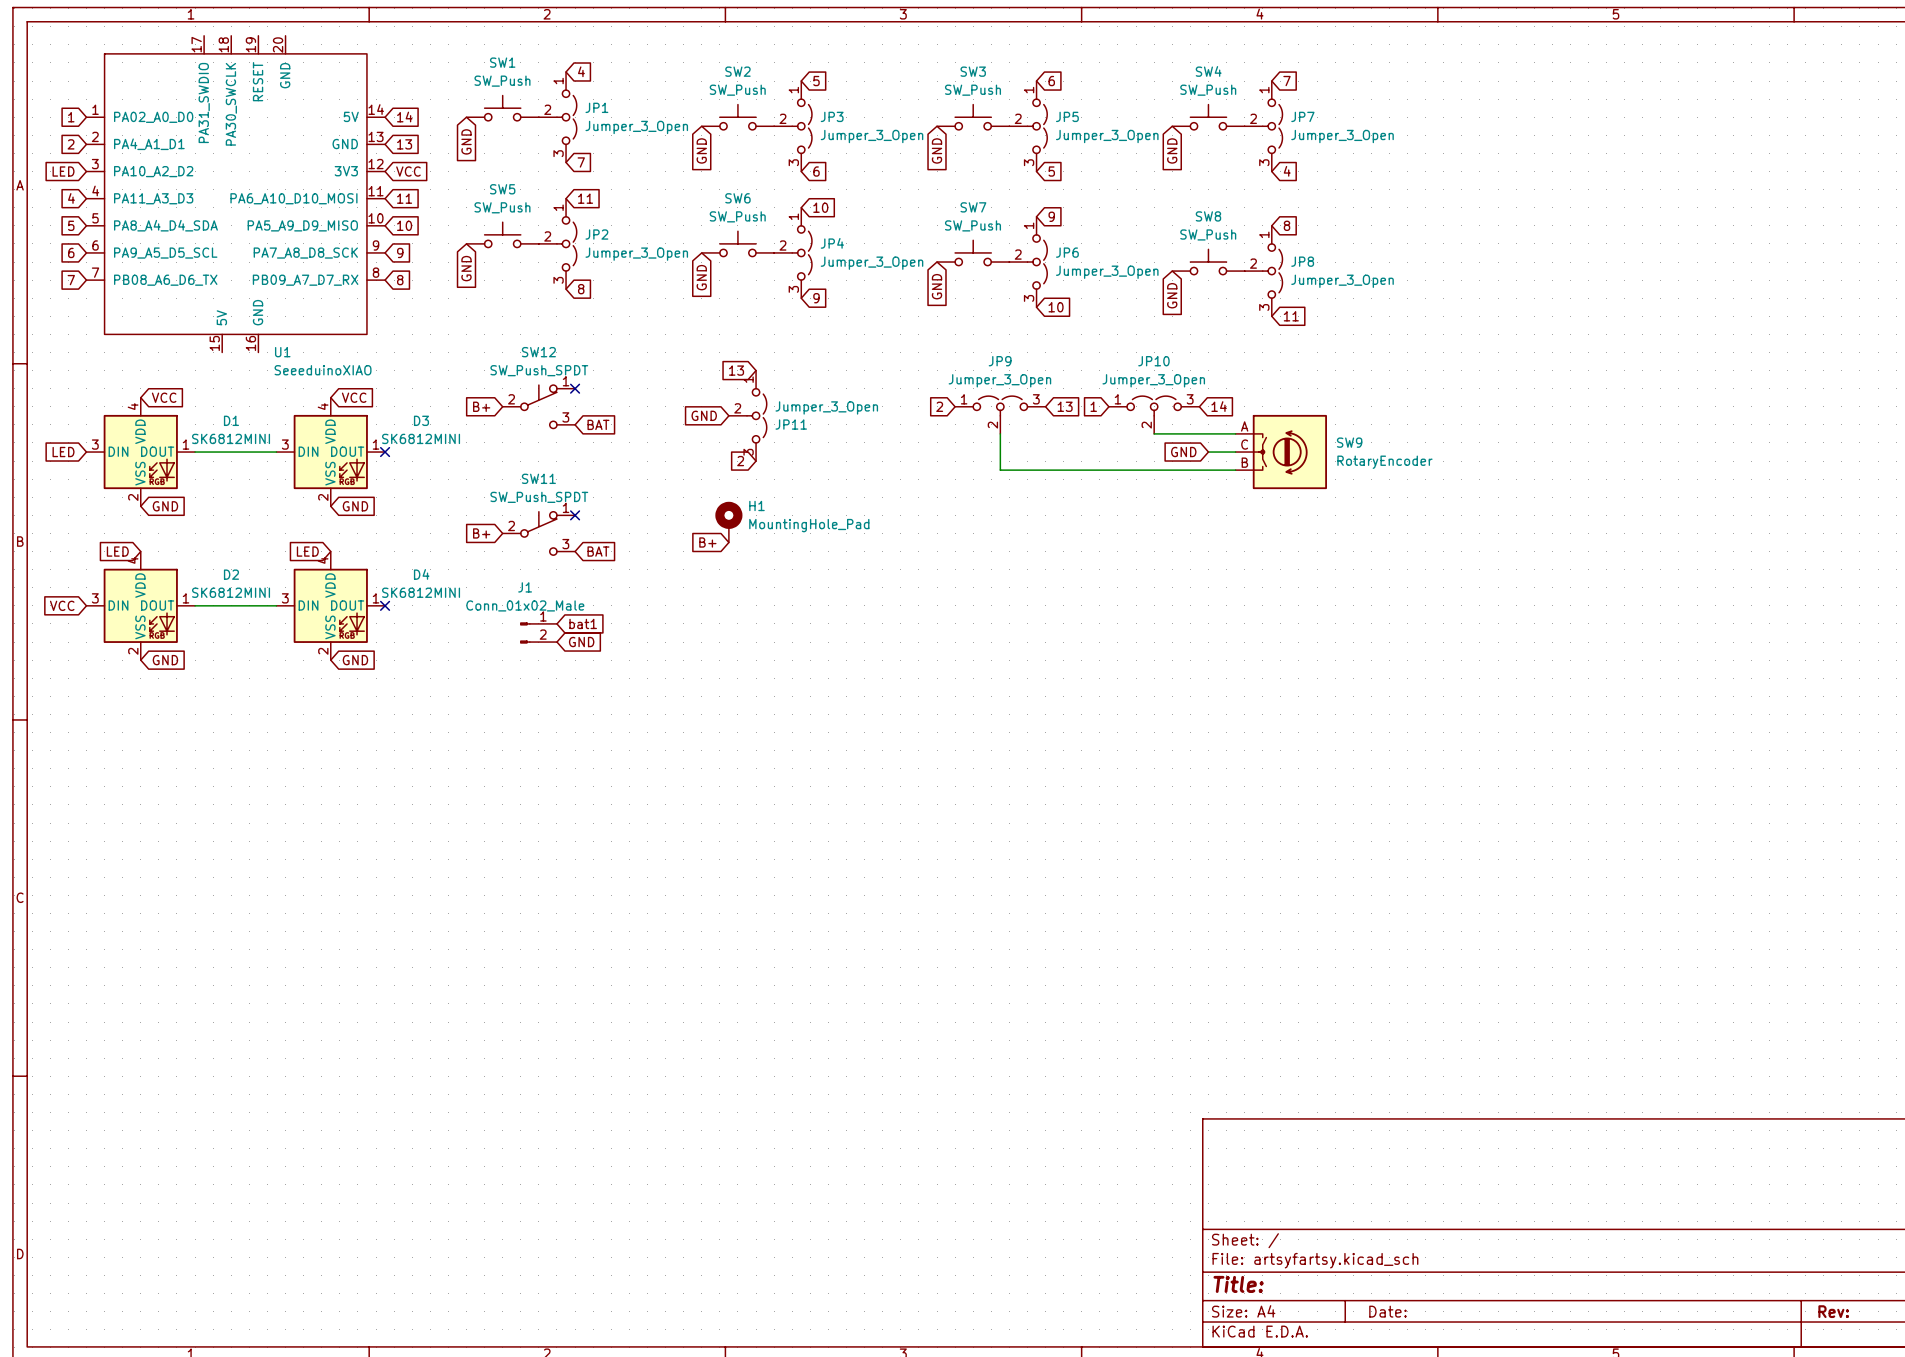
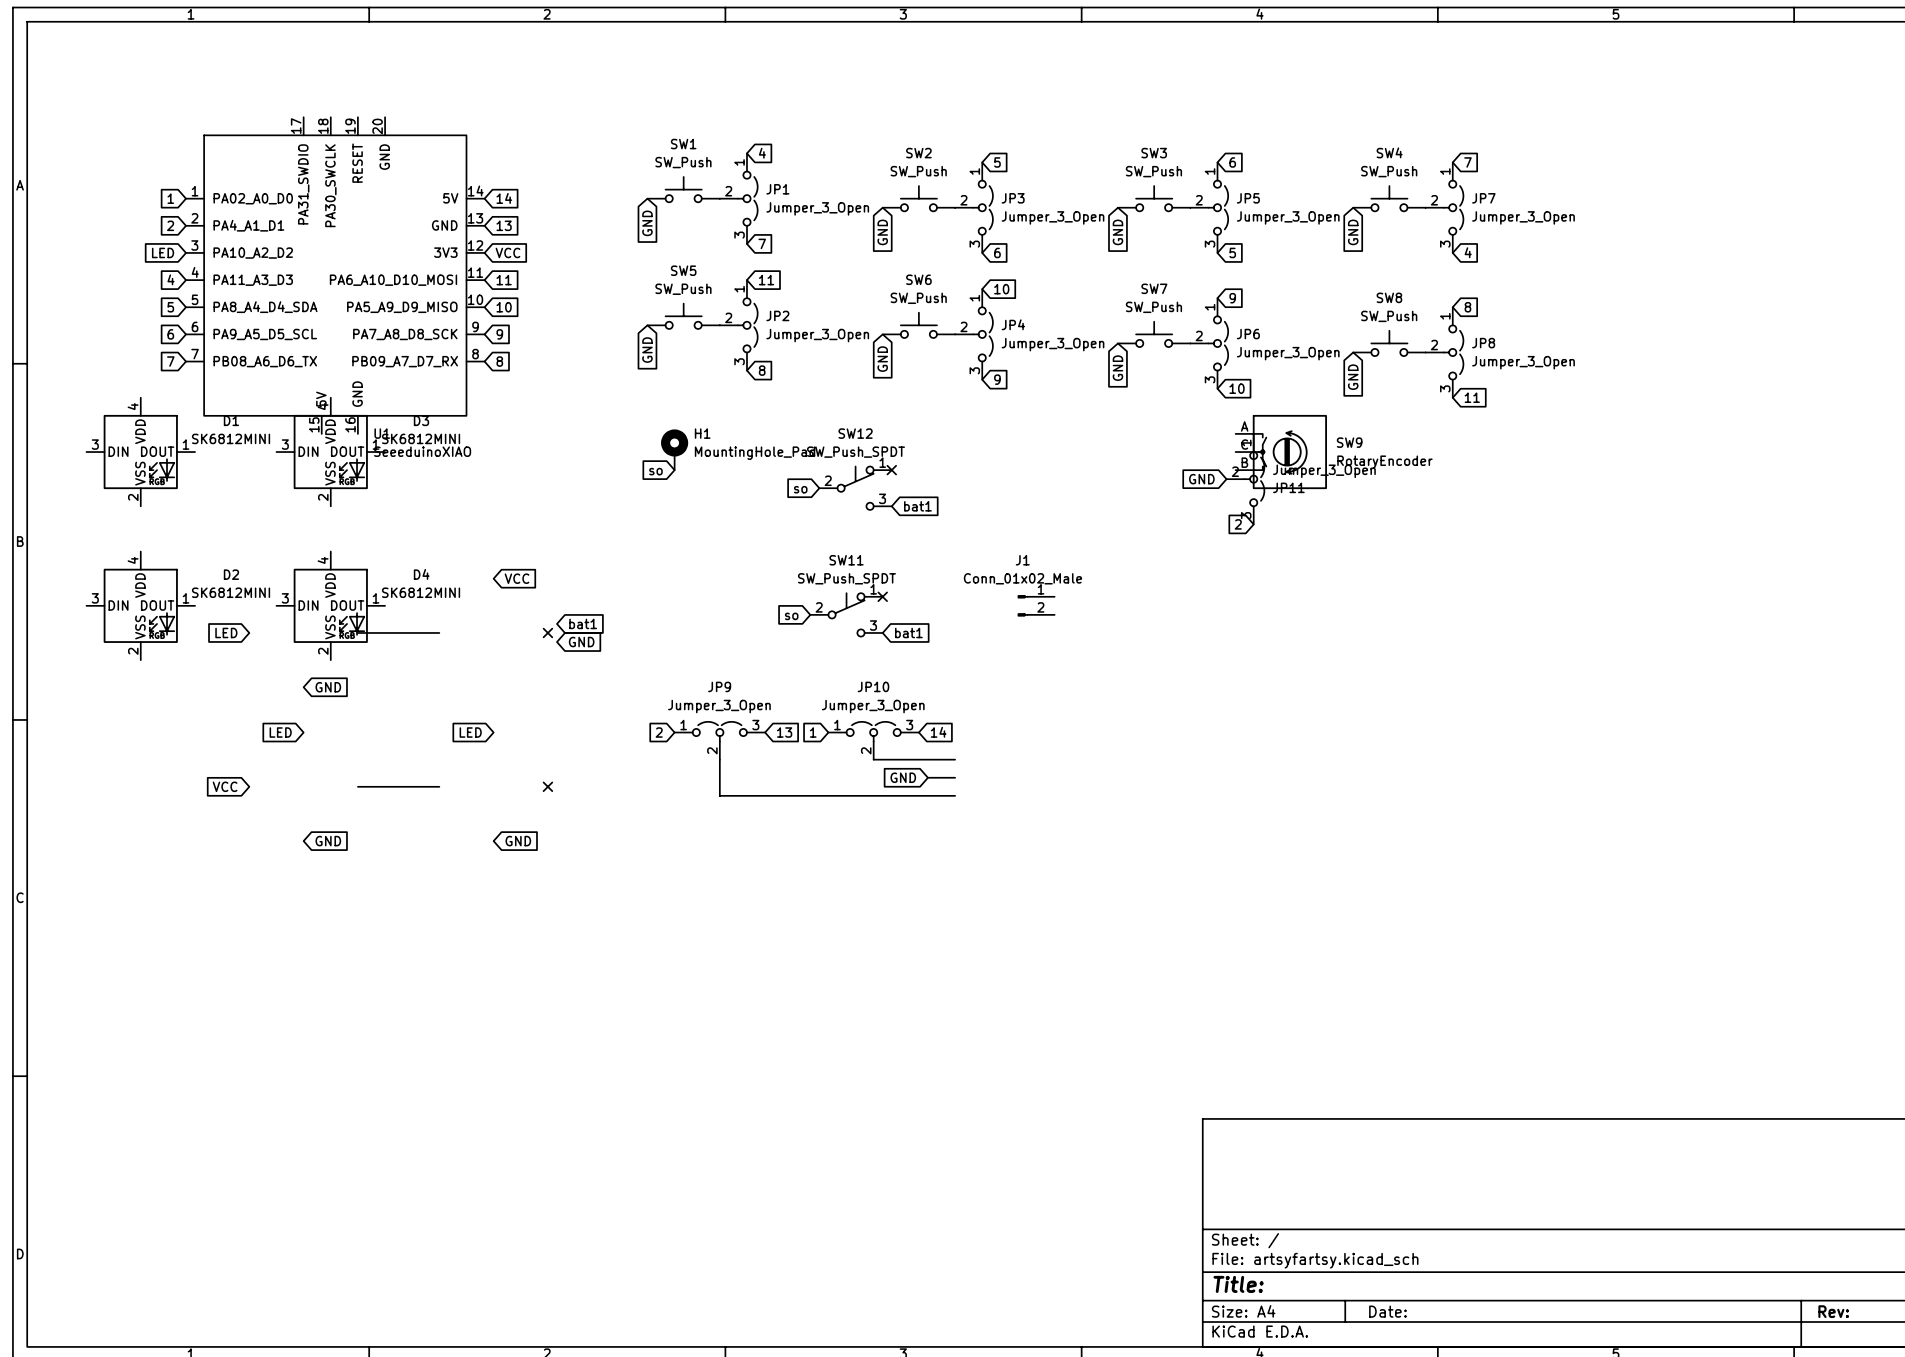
global label: 4 (581, 71) -> none
global label: 5 (816, 81) -> none
global label: 6 (1051, 81) -> none
global label: 7 (1286, 81) -> none
SW1 position: (502, 108) -> (683, 189)
global label position: 1 (71, 117) -> 1 (170, 198)
global label position: 14 (404, 117) -> 14 (504, 198)
JP1 position: (557, 117) -> (738, 198)
SW2 position: (737, 117) -> (918, 198)
SW3 position: (973, 117) -> (1154, 198)
SW4 position: (1208, 117) -> (1389, 198)
JP3 position: (793, 126) -> (974, 207)
JP5 position: (1028, 126) -> (1209, 207)
JP7 position: (1263, 126) -> (1444, 207)
global label: GND (466, 141) -> none
global label position: 2 (71, 144) -> 2 (170, 225)
global label position: 13 (404, 144) -> 13 (504, 225)
global label: GND (701, 150) -> none
global label: GND (937, 150) -> none
global label: GND (1172, 150) -> none
global label: none -> 4 (762, 153)
global label: 7 (581, 162) -> none
global label: none -> 6 (1232, 162)
global label: none -> 7 (1467, 162)
global label: LED (63, 171) -> none
global label: VCC (408, 171) -> none
global label: 6 (816, 171) -> none
global label position: 5 (1051, 171) -> 5 (997, 162)
global label: 4 (1287, 171) -> none
U1 position: (235, 194) -> (335, 275)
global label position: 4 (71, 198) -> 4 (171, 279)
global label: 11 (404, 198) -> none
global label: 11 (585, 198) -> none
global label: 10 (820, 207) -> none
global label: 9 (1051, 216) -> none
global label: none -> GND (647, 223)
global label position: 5 (71, 225) -> 5 (170, 307)
global label position: 10 (404, 225) -> 10 (504, 307)
global label: 8 (1286, 225) -> none
global label: none -> GND (882, 232)
global label: none -> GND (1117, 232)
global label: none -> GND (1353, 232)
SW5 position: (502, 234) -> (683, 316)
JP2 position: (557, 243) -> (738, 325)
SW6 position: (737, 243) -> (918, 325)
global label: none -> 7 (762, 243)
global label position: 6 (71, 252) -> 6 (170, 334)
global label: none -> LED (163, 252)
global label position: 9 (400, 252) -> 9 (499, 334)
global label: none -> VCC (507, 252)
JP4 position: (793, 252) -> (974, 334)
SW7 position: (973, 252) -> (1154, 334)
global label: none -> 6 (997, 252)
global label: none -> 5 (1232, 252)
global label: none -> 4 (1468, 252)
JP6 position: (1028, 262) -> (1209, 343)
SW8 position: (1208, 262) -> (1389, 343)
global label: GND (466, 268) -> none
JP8 position: (1263, 271) -> (1444, 352)
global label: GND (701, 277) -> none
global label position: 7 (71, 280) -> 7 (170, 361)
global label: 8 (400, 280) -> none
global label: none -> 11 (504, 280)
global label: none -> 11 (766, 280)
global label: GND (937, 286) -> none
global label: 8 (581, 289) -> none
global label: GND (1172, 295) -> none
global label: 9 (816, 298) -> none
global label: none -> 9 (1232, 298)
global label position: 10 (1056, 307) -> 10 (1001, 289)
global label: none -> 8 (1467, 307)
global label: 11 (1291, 316) -> none
global label: none -> GND (647, 350)
global label: none -> GND (882, 359)
global label: none -> 8 (499, 361)
global label: none -> GND (1117, 368)
global label: 13 (736, 370) -> none
global label: none -> 8 (762, 370)
global label: none -> GND (1353, 377)
global label: none -> 9 (997, 379)
no-connect mark: (575, 388) -> none
global label: none -> 10 (1237, 388)
global label: VCC (164, 397) -> none
global label: VCC (354, 397) -> none
global label: none -> 11 (1472, 397)
global label: B+ (481, 406) -> none
SW12 position: (538, 406) -> (855, 488)
global label: 2 (939, 406) -> none
global label: 13 (1065, 406) -> none
global label: 1 (1093, 406) -> none
global label: 14 (1219, 406) -> none
global label: GND (704, 415) -> none
JP11 position: (747, 415) -> (1245, 479)
JP9 position: (1000, 415) -> (719, 740)
JP10 position: (1154, 415) -> (873, 740)
global label: BAT (598, 424) -> none
wire: (1000, 433) (1000, 470) (1235, 470) -> none
wire: (1154, 433) (1235, 433) -> none
global label: LED (63, 452) -> none
wire: (195, 452) (276, 452) -> none
no-connect mark: (385, 452) -> none
global label position: GND (1183, 452) -> GND (1201, 479)
wire: (1208, 452) (1235, 452) -> none
global label: 2 (740, 461) -> none
no-connect mark: none -> (891, 470)
global label: none -> so (655, 471)
global label: none -> so (800, 489)
global label: GND (165, 506) -> none
global label: GND (355, 506) -> none
global label: none -> bat1 (917, 506)
no-connect mark: (575, 515) -> none
H1 position: (728, 522) -> (674, 449)
global label: none -> 2 (1238, 524)
global label: B+ (481, 533) -> none
SW11 position: (538, 533) -> (846, 614)
global label: B+ (707, 542) -> none
global label: LED (117, 551) -> none
global label: LED (307, 551) -> none
global label: BAT (598, 551) -> none
global label: none -> VCC (517, 578)
no-connect mark: none -> (882, 596)
global label: VCC (62, 605) -> none
wire: (195, 605) (276, 605) -> (357, 632) (439, 632)
no-connect mark: (385, 605) -> none
global label: none -> so (791, 616)
global label: none -> LED (226, 632)
J1 position: (538, 632) -> (1036, 605)
no-connect mark: none -> (547, 632)
global label: none -> bat1 (908, 632)
global label: GND (165, 660) -> none
global label position: GND (355, 660) -> GND (328, 687)
global label: none -> LED (280, 732)
global label: none -> LED (470, 732)
global label: none -> 2 (659, 732)
global label: none -> 13 (784, 732)
global label: none -> 1 (813, 732)
global label: none -> 14 (938, 732)
wire: none -> (719, 759) (719, 795) (955, 795)
wire: none -> (873, 759) (955, 759)
global label: none -> GND (903, 777)
wire: none -> (927, 777) (955, 777)
global label: none -> VCC (225, 786)
wire: none -> (357, 786) (439, 786)
no-connect mark: none -> (547, 786)
global label: none -> GND (328, 841)
global label: none -> GND (518, 841)

